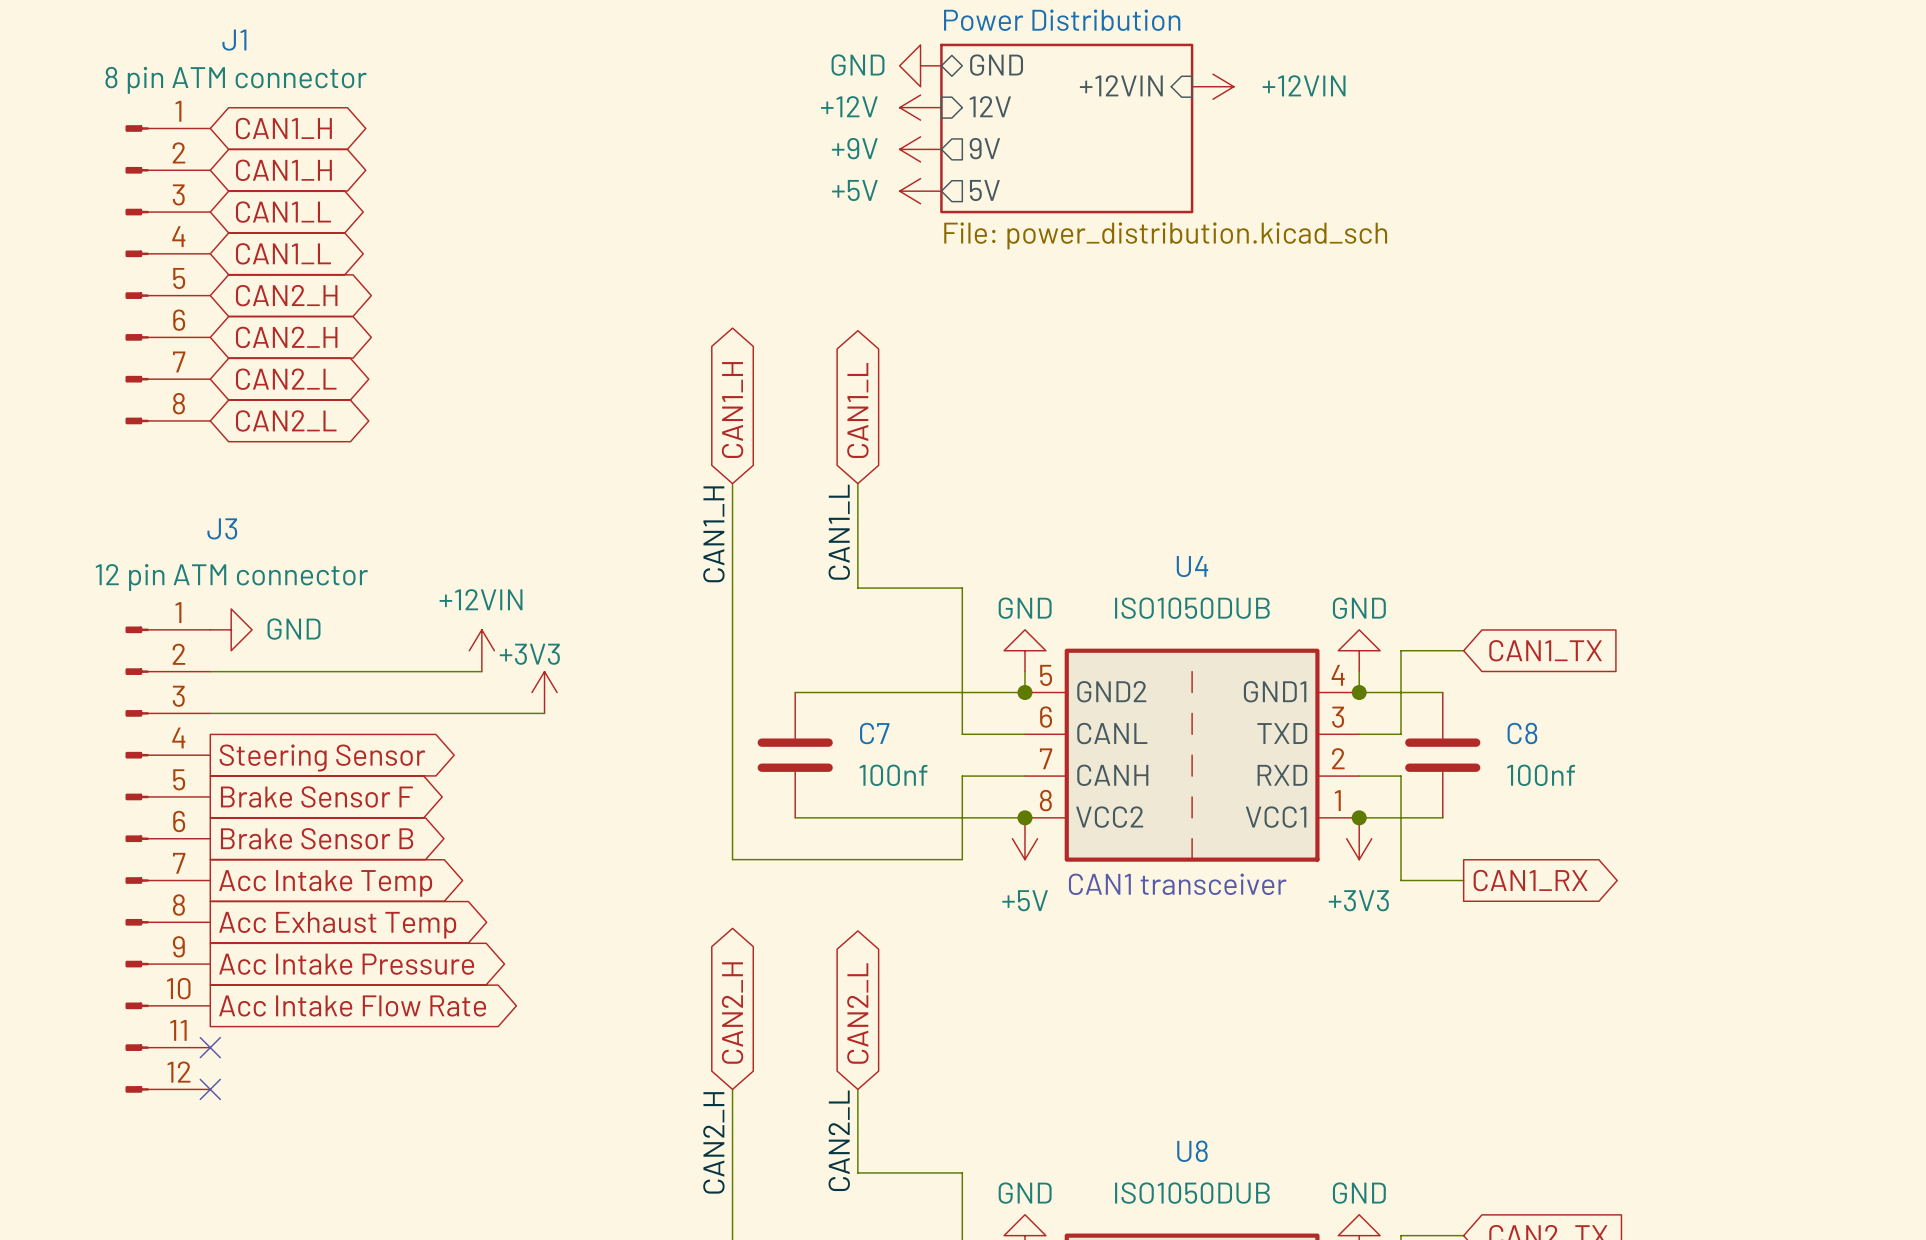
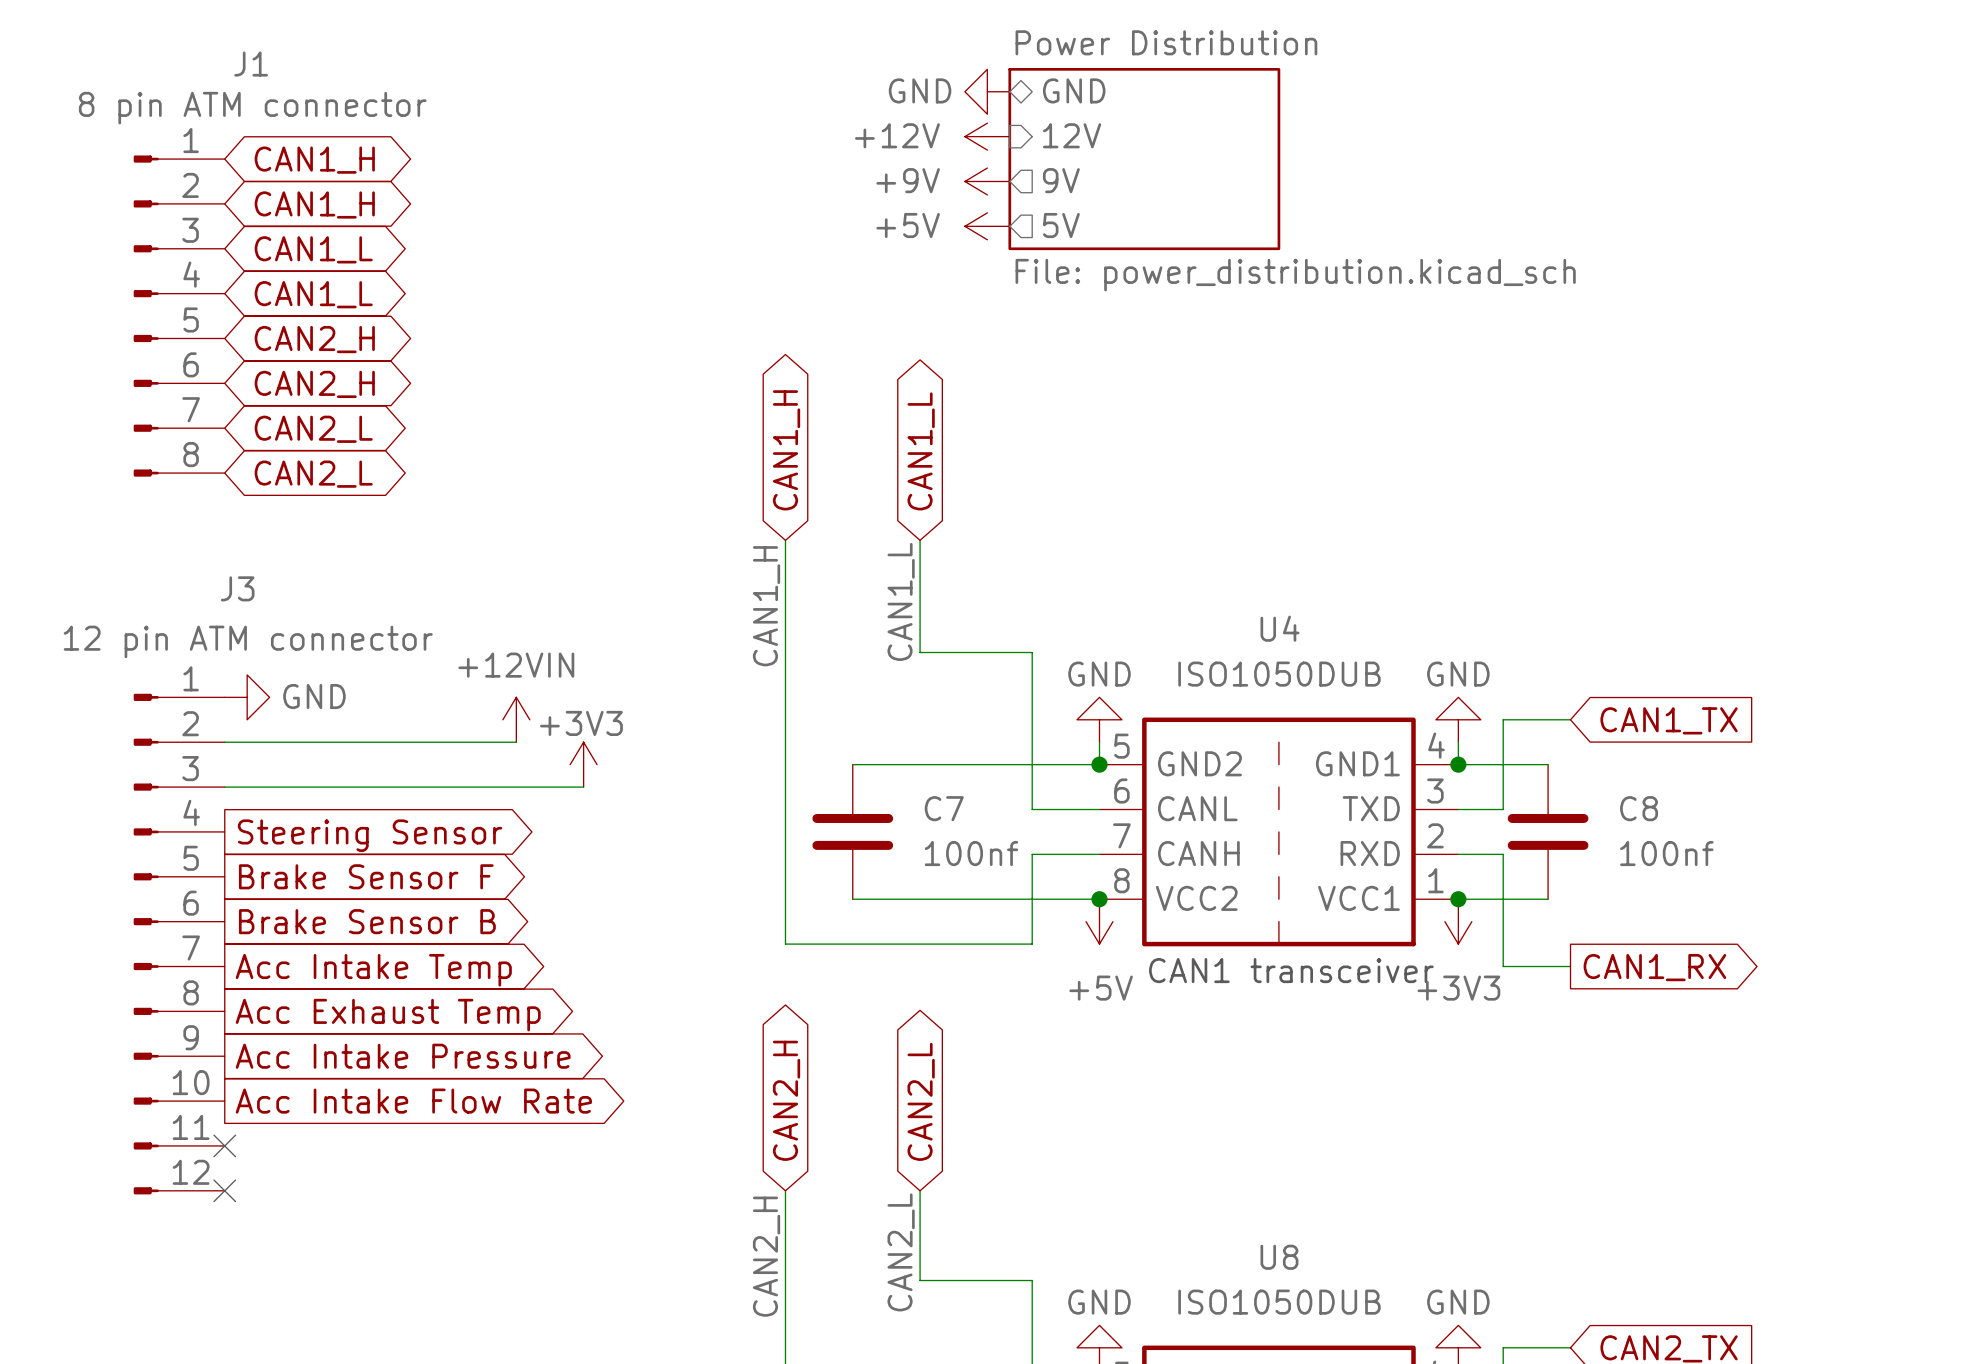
sheet pin: +12VIN (1121, 85) -> none
power symbol: +12VIN (1212, 86) -> none

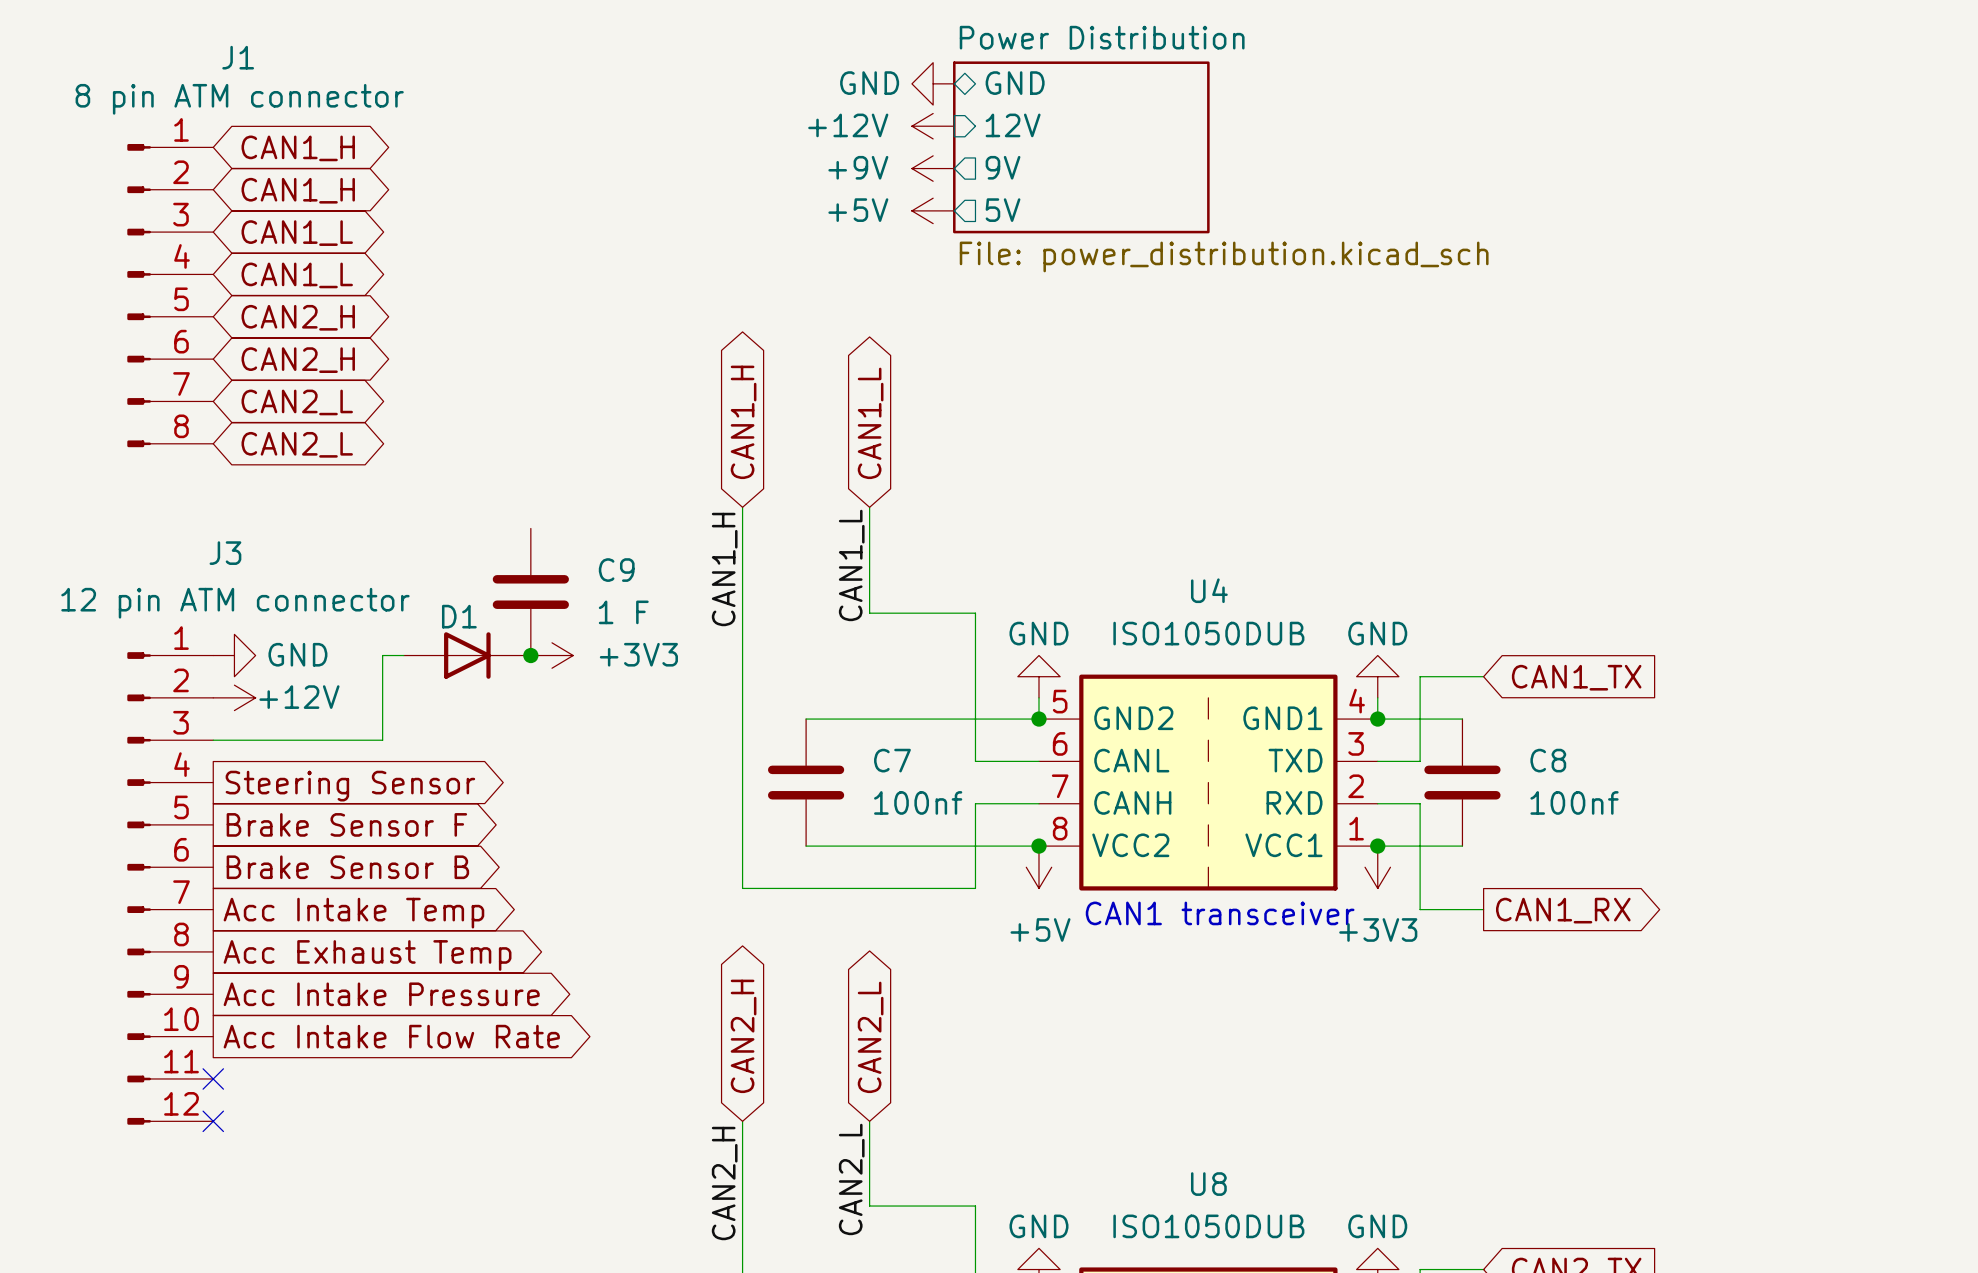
C9: none -> 1 F (530, 592)
D1: none -> (467, 655)
junction: none -> (530, 655)
power symbol: +12VIN (516, 719) -> none
power symbol text position: +3V3 (581, 723) -> +3V3 (638, 654)
wire: (224, 742) (516, 742) -> none
power symbol: none -> +12V (234, 697)
power symbol rotation: 0° (583, 764) -> 90° clockwise (552, 655)
power symbol position: +3V3 (583, 764) -> +3V3 (552, 655)
wire: (404, 787) (583, 787) -> (382, 740) (382, 655) (403, 655)

